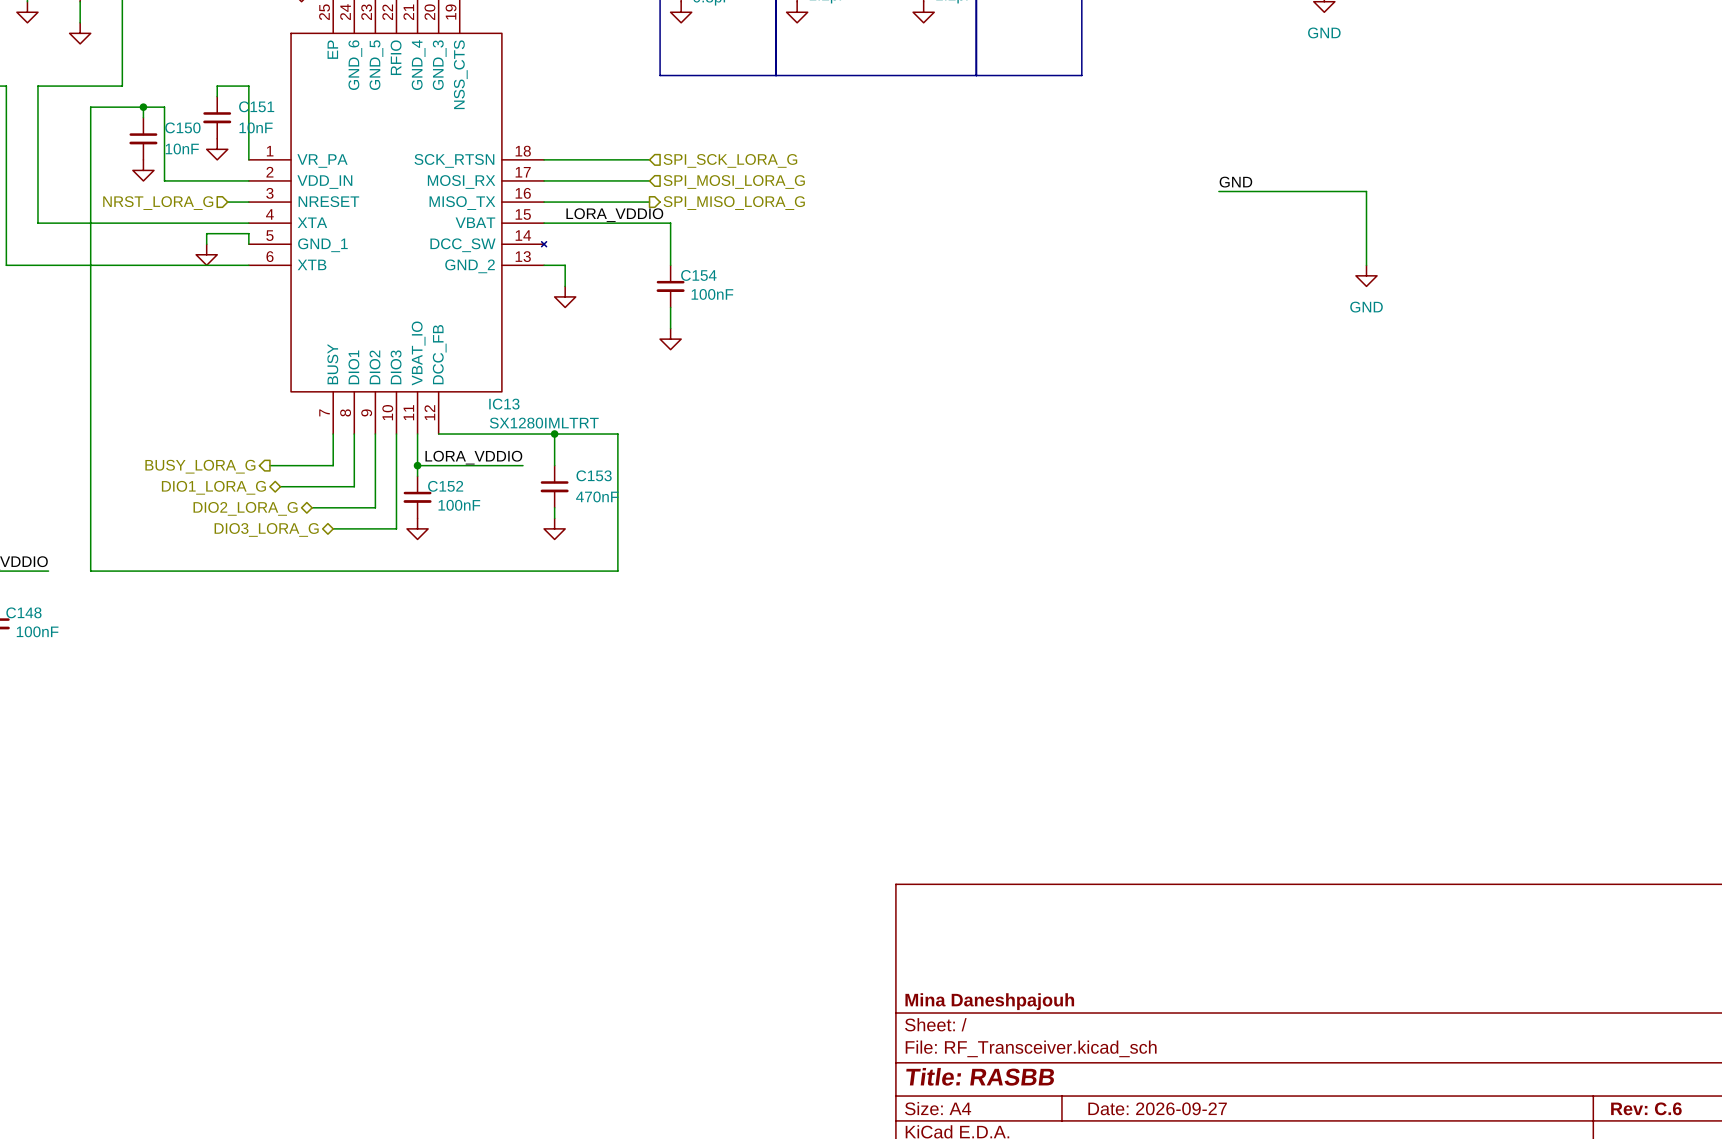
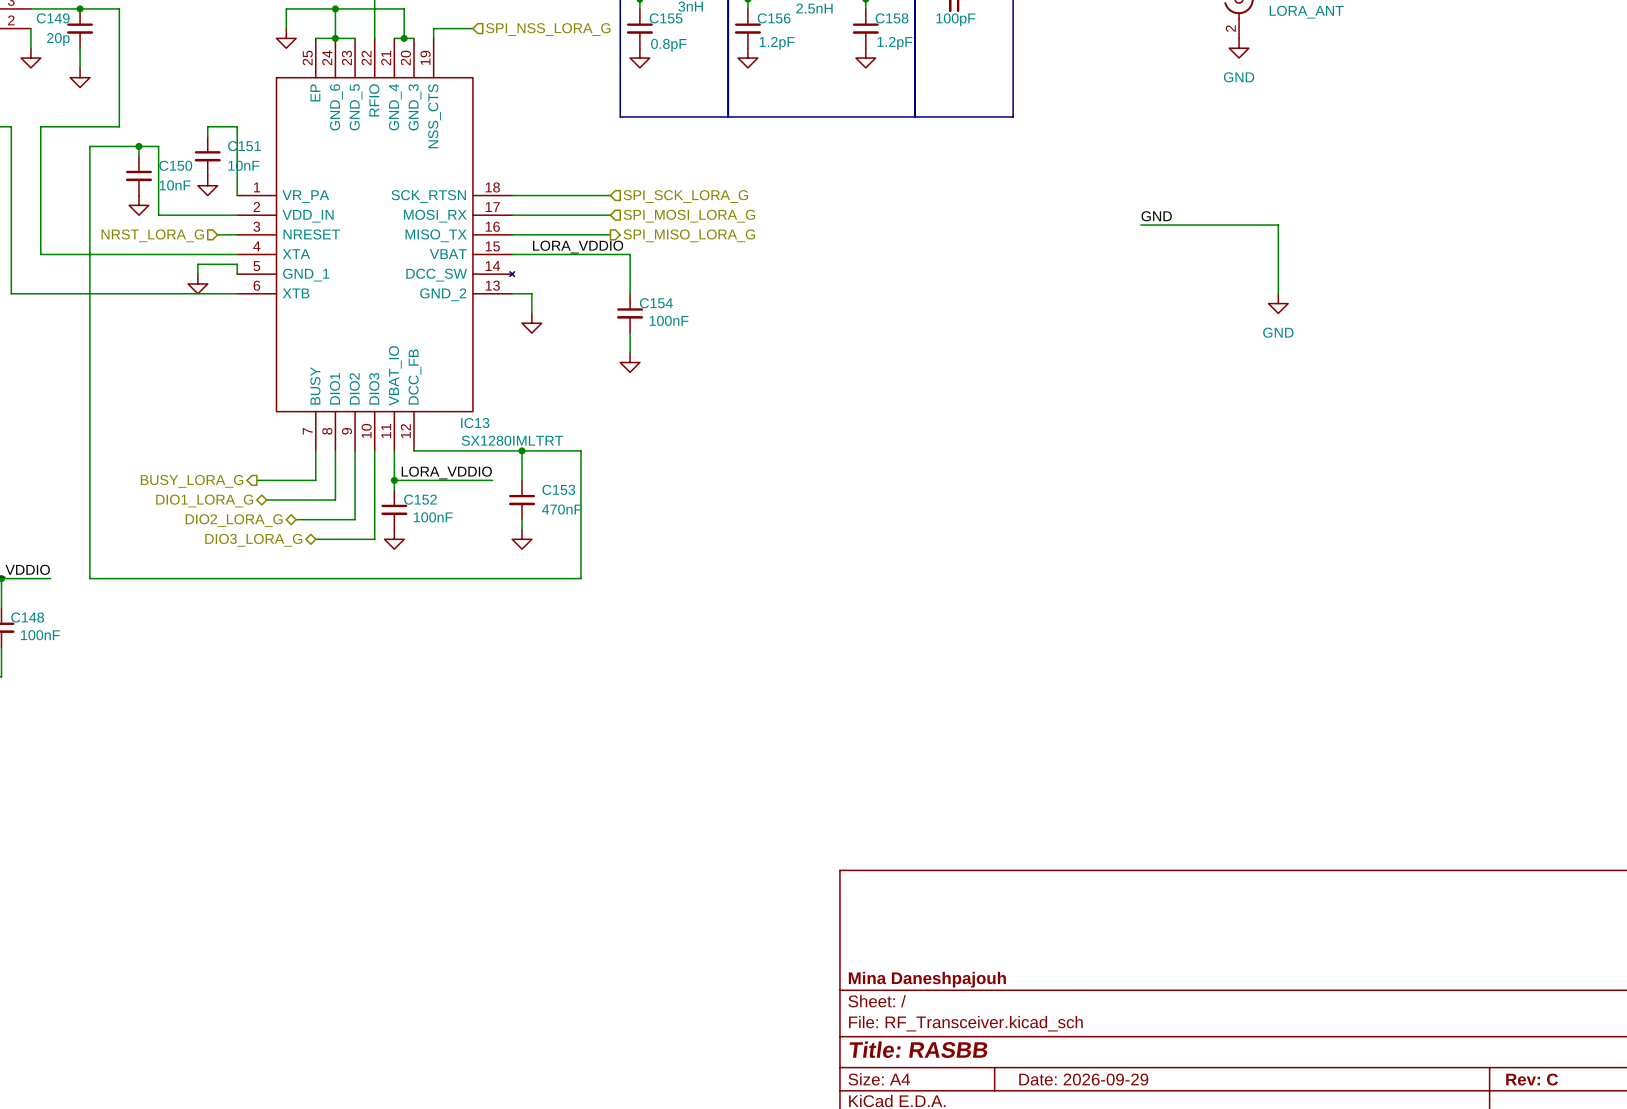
title block: Date: 2026-09-27 (1157, 1108) -> Date: 2026-09-29 (1083, 1079)
title block: Rev: C.6 (1646, 1108) -> Rev: C (1532, 1079)

